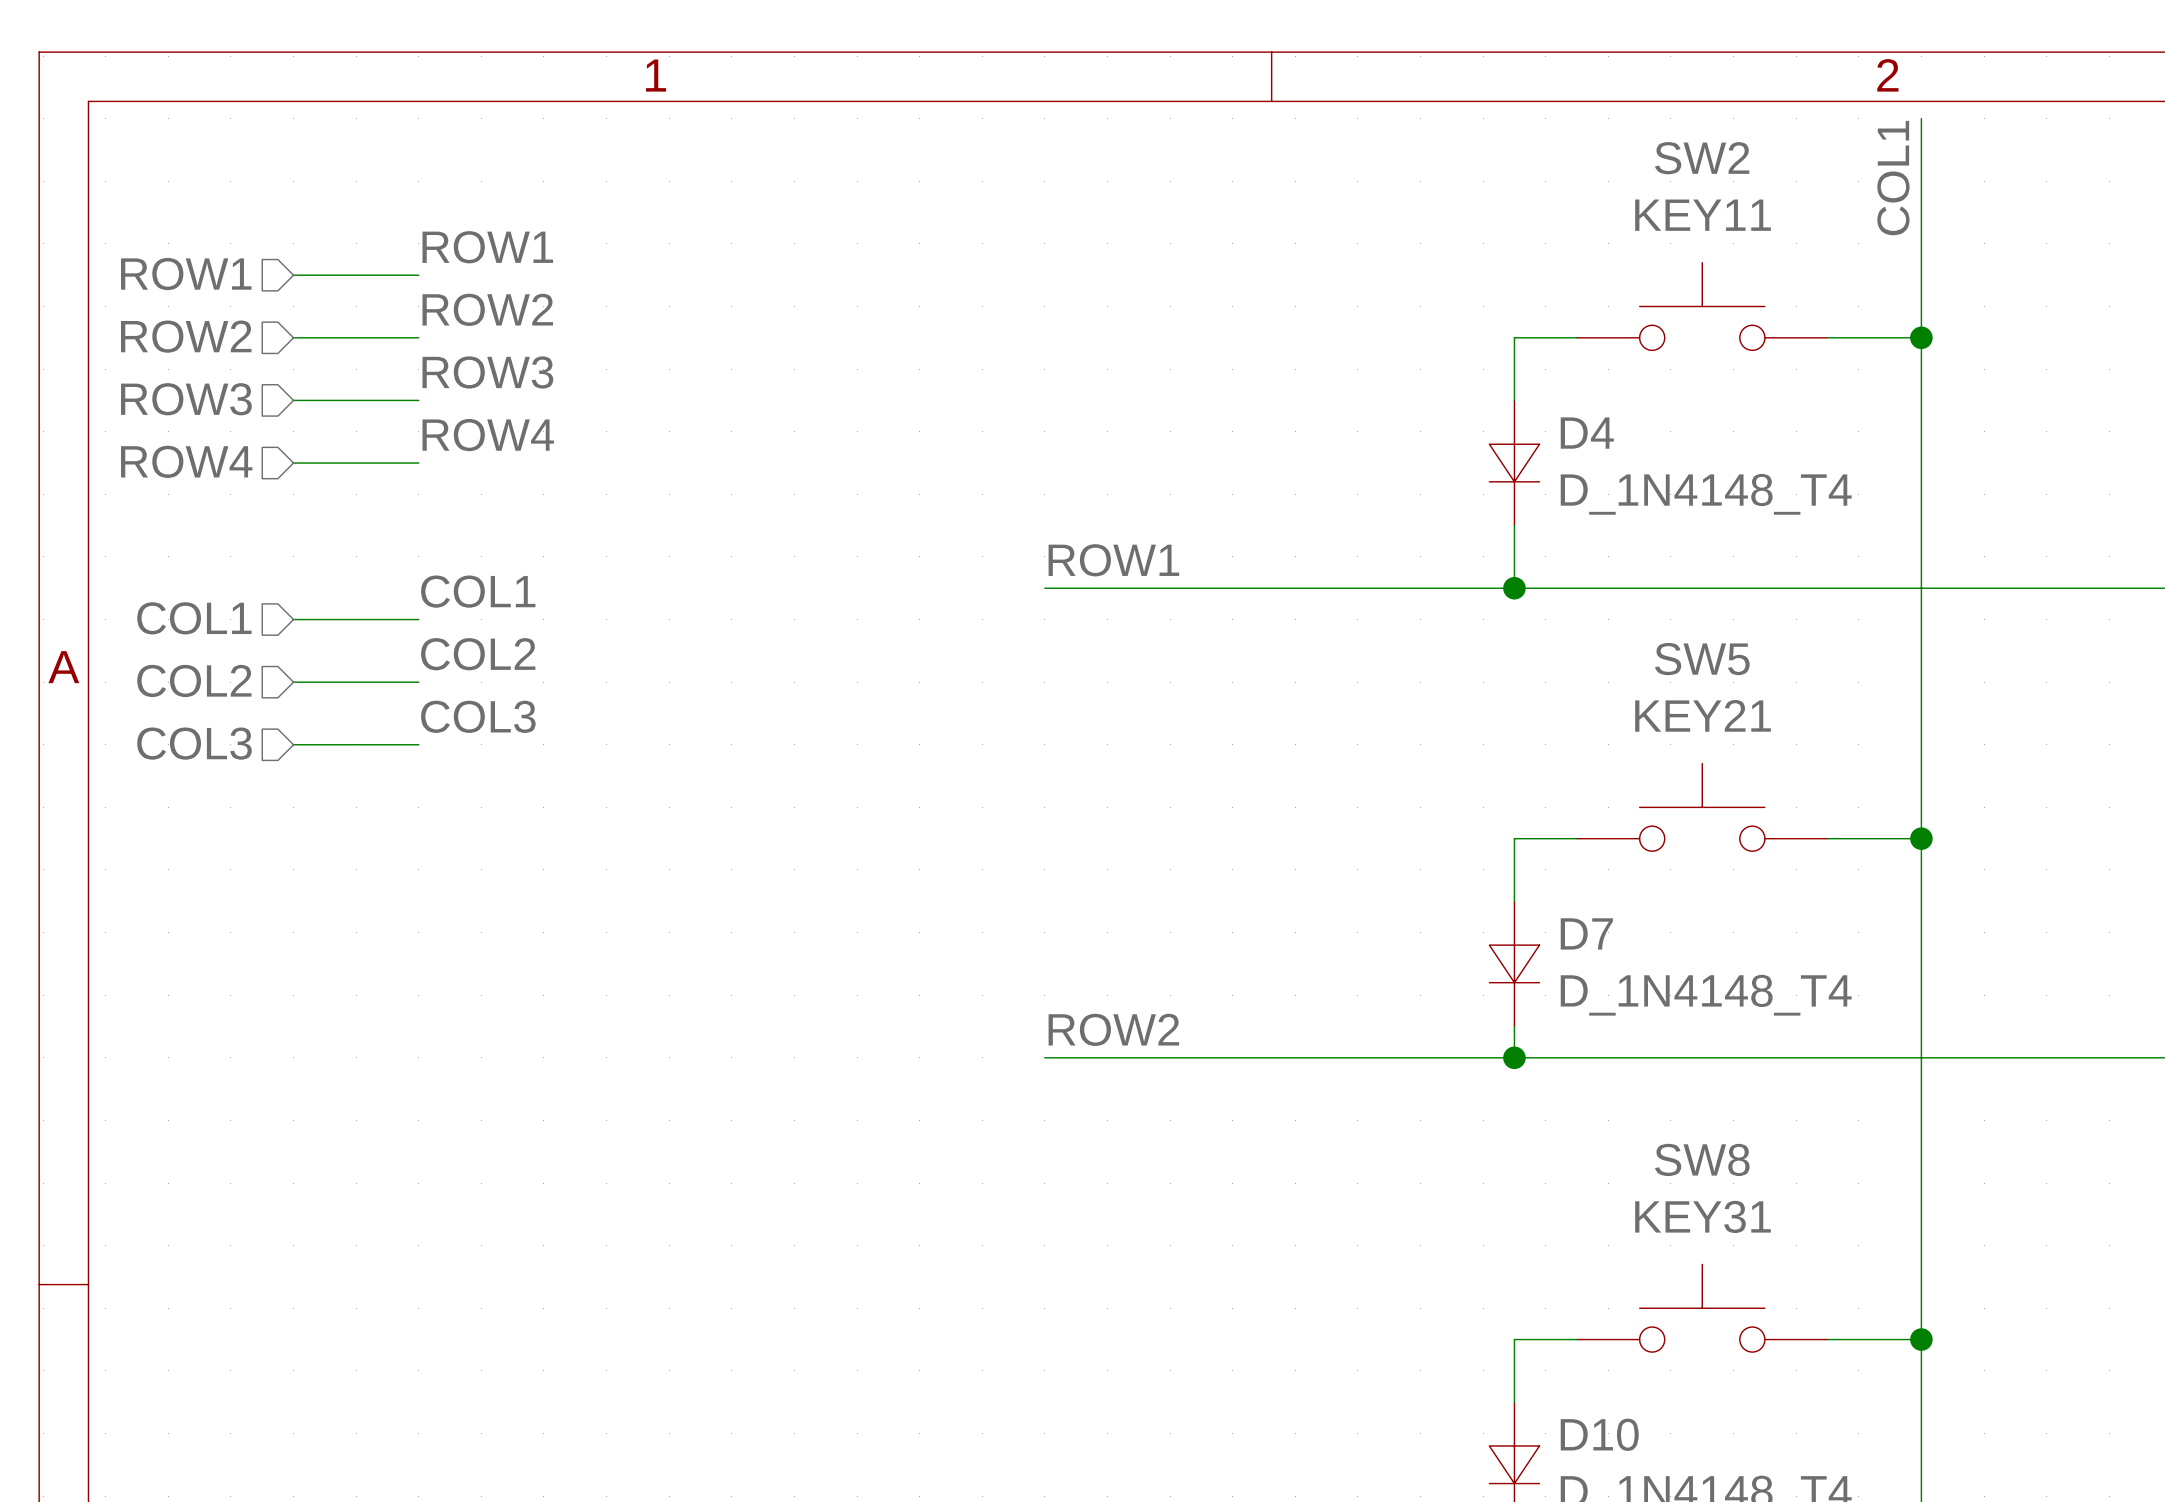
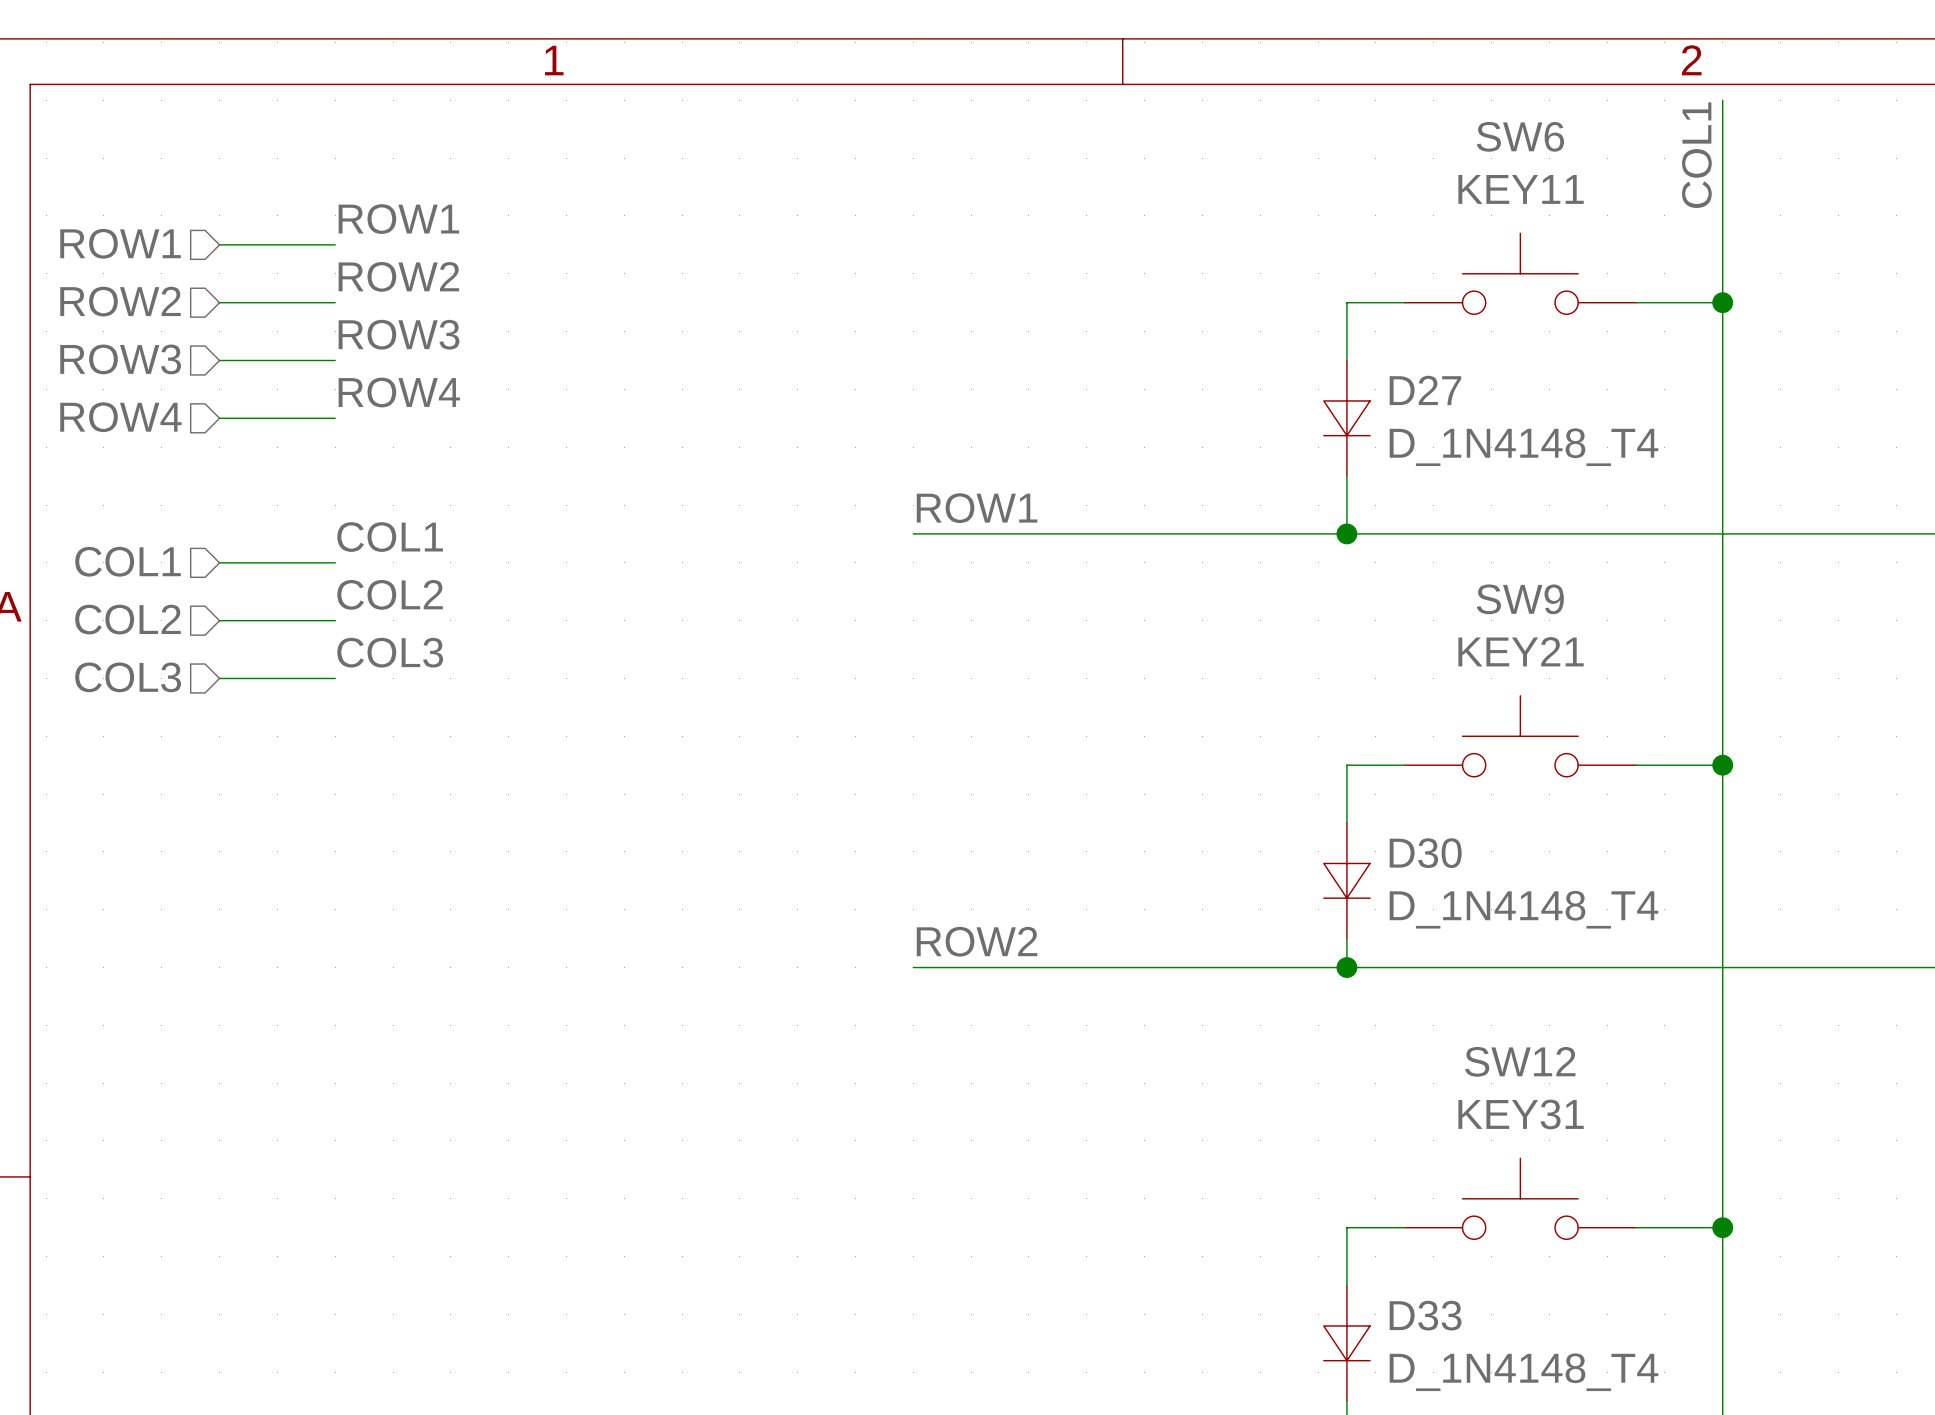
SW2 name: SW2 (1702, 158) -> SW6 (1520, 136)
D4 name: D4 (1587, 433) -> D27 (1425, 390)
SW5 name: SW5 (1702, 659) -> SW9 (1520, 599)
D7 name: D7 (1586, 933) -> D30 (1425, 853)
SW8 name: SW8 (1702, 1159) -> SW12 (1520, 1061)
D10 name: D10 (1599, 1434) -> D33 (1425, 1315)

